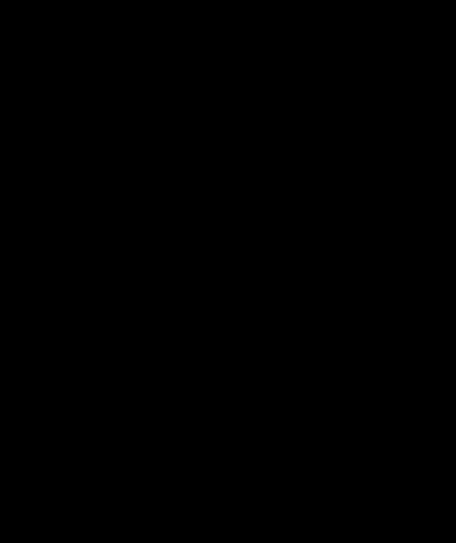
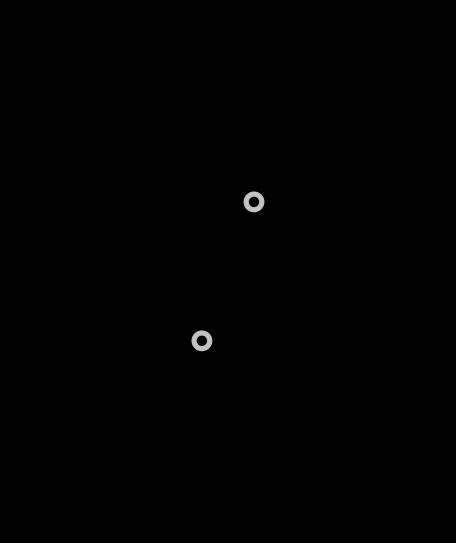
via: none -> (253, 201)
via: none -> (201, 340)

